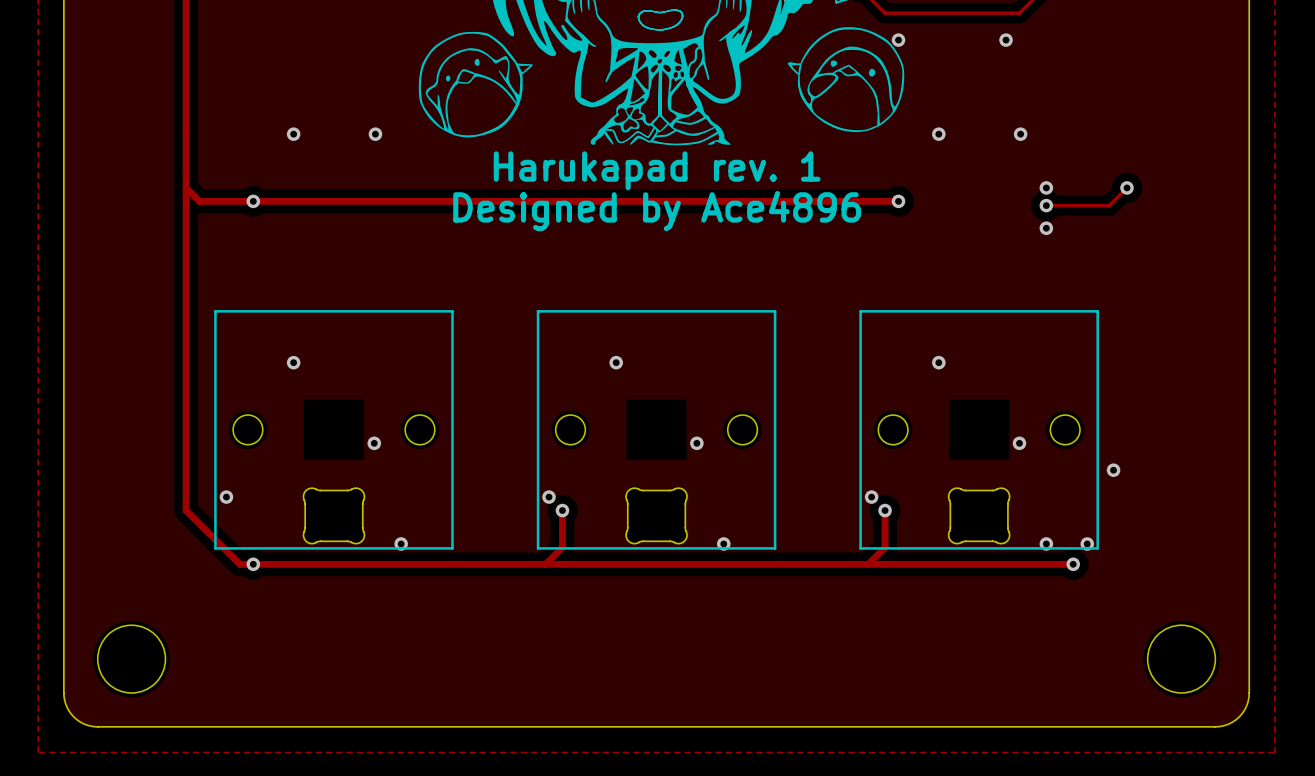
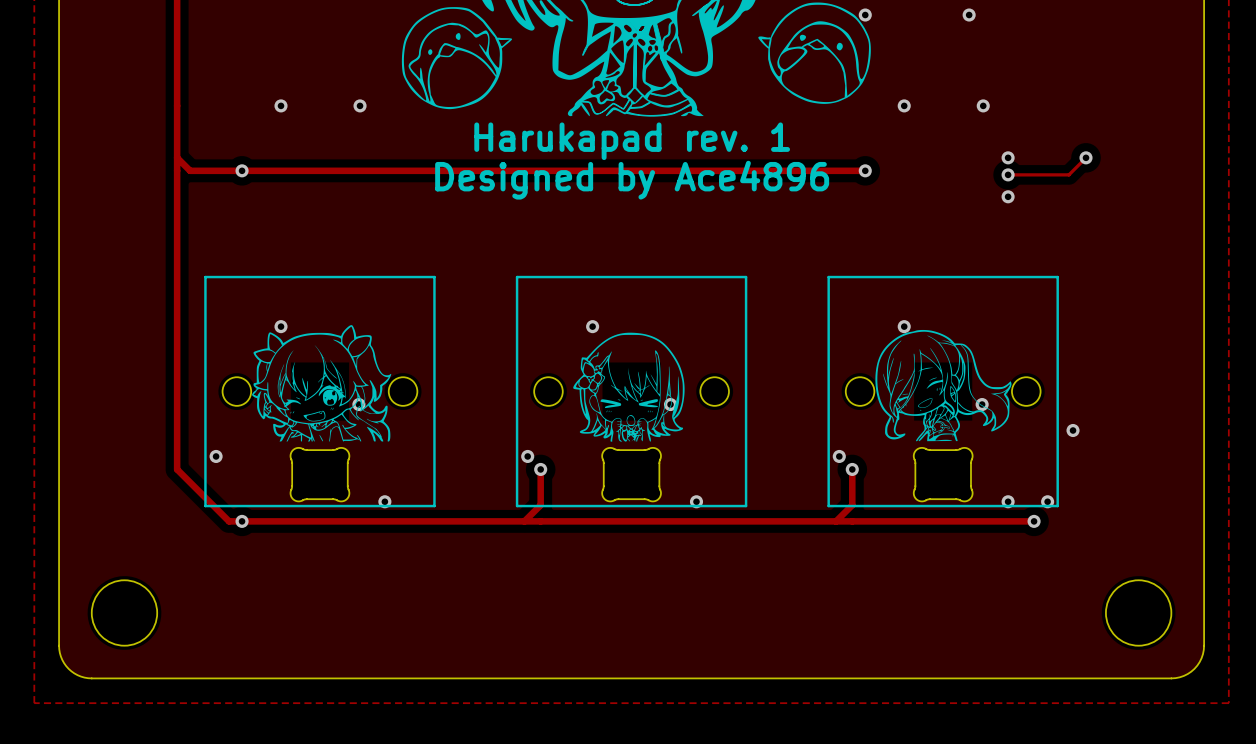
drawing: none -> [252, 325, 392, 442]
drawing: none -> [875, 329, 1012, 442]
drawing: none -> [573, 332, 685, 442]

